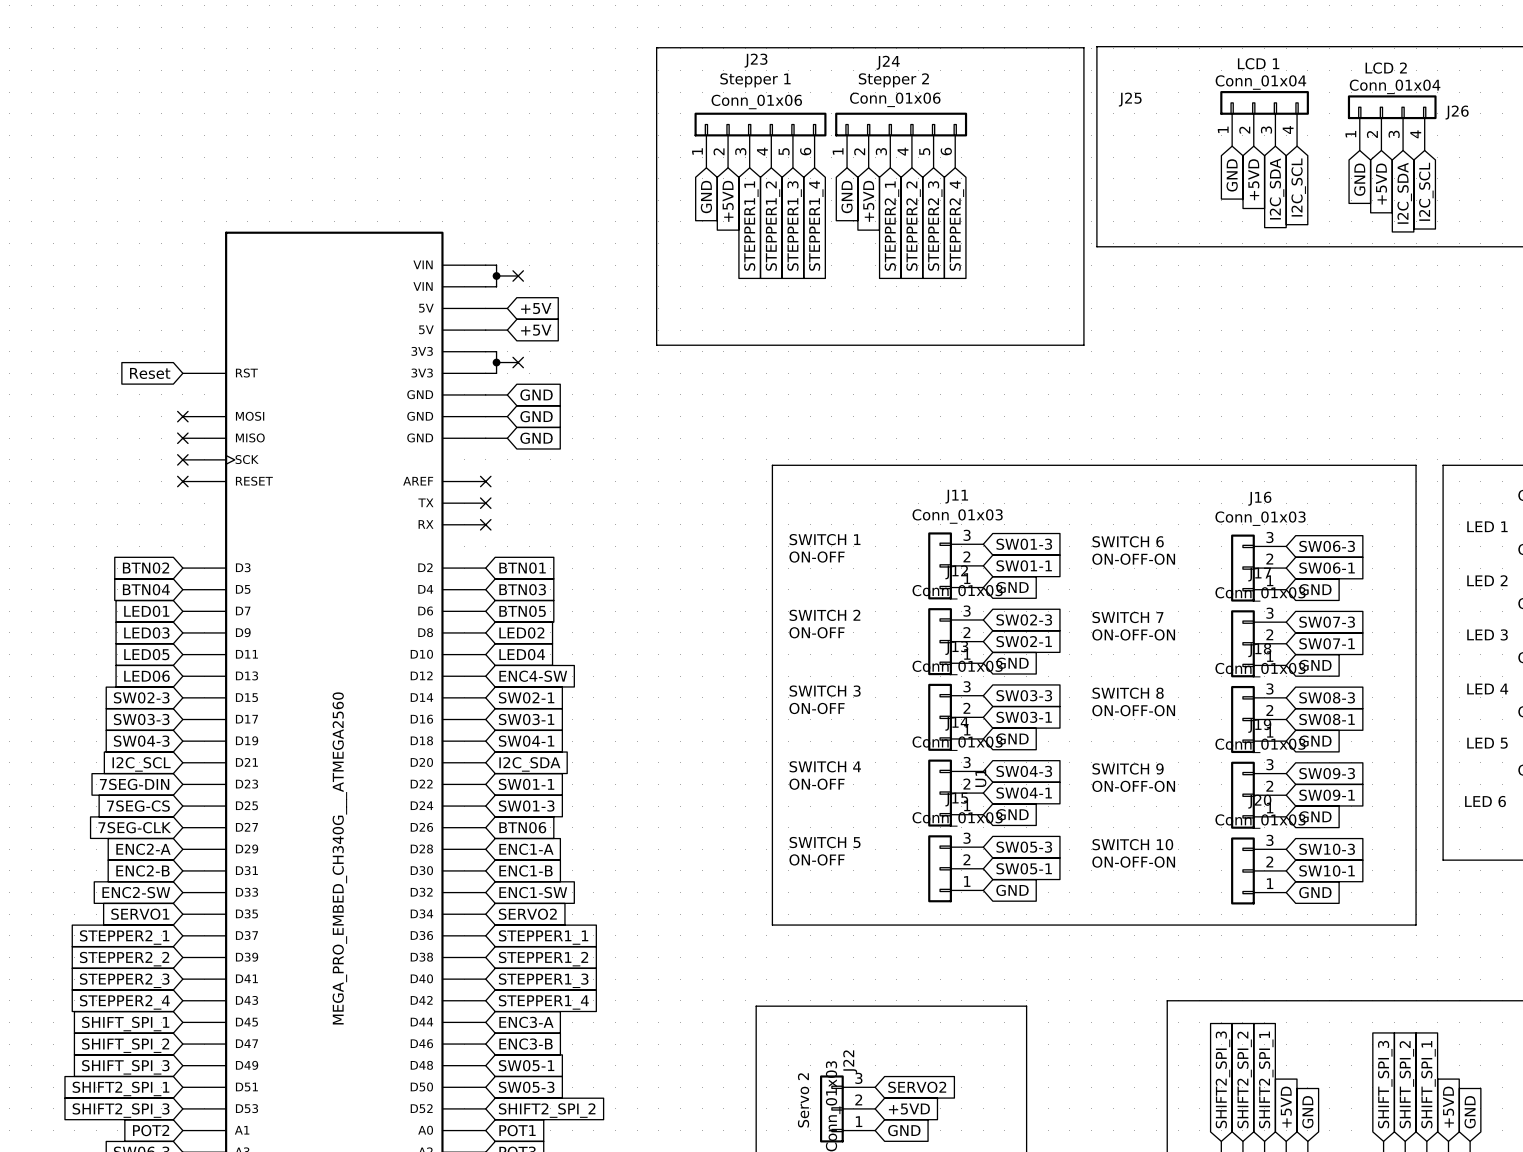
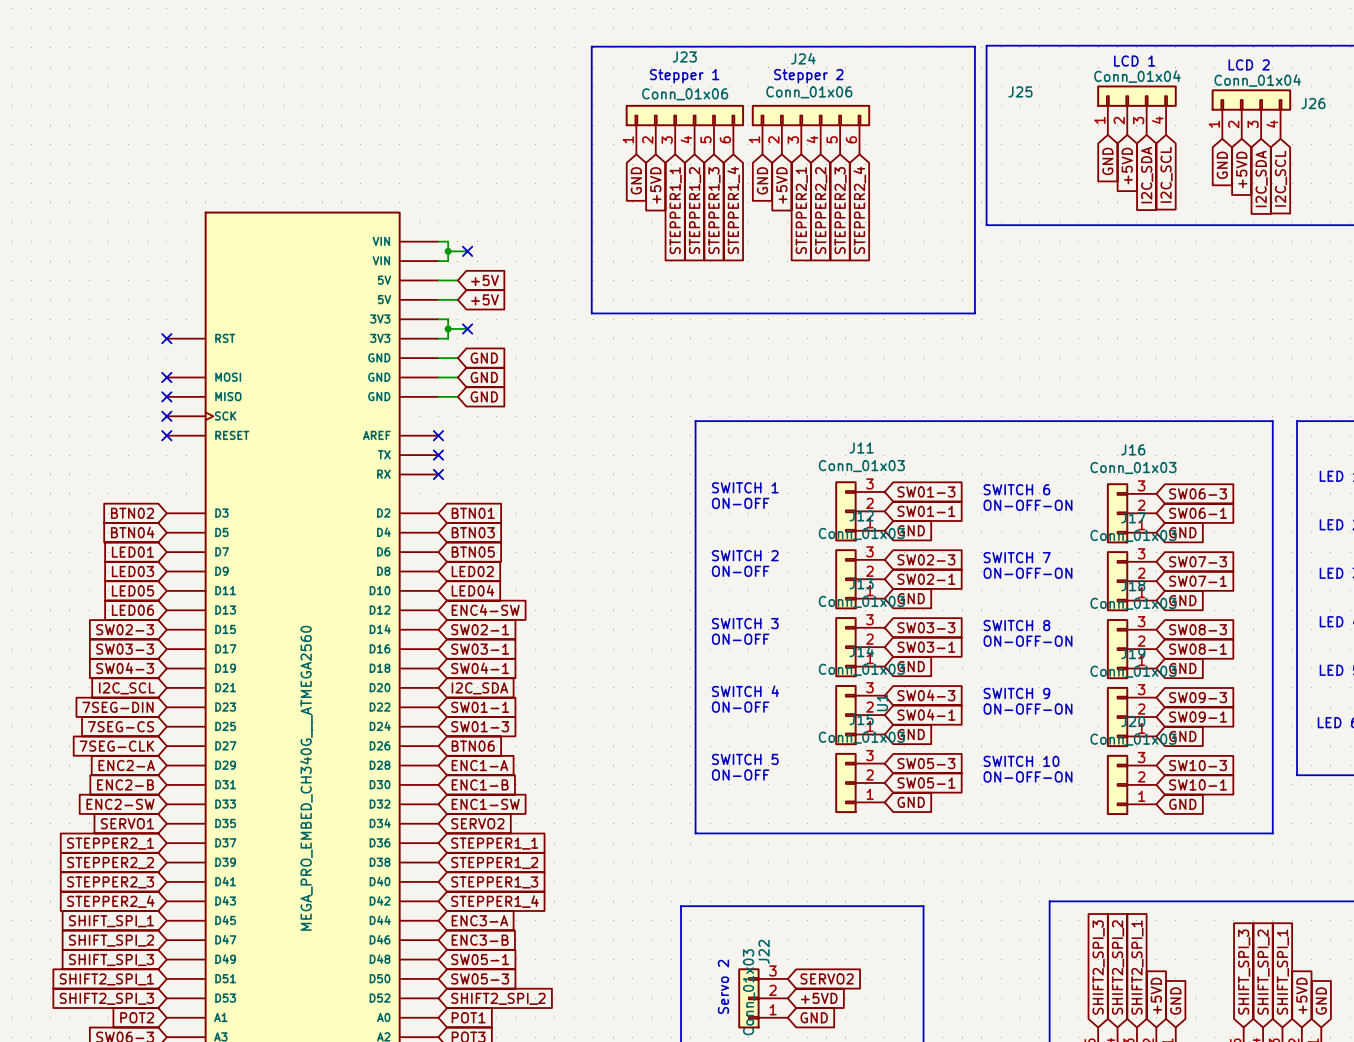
global label: Reset (150, 373) -> none
no-connect mark: none -> (166, 338)

